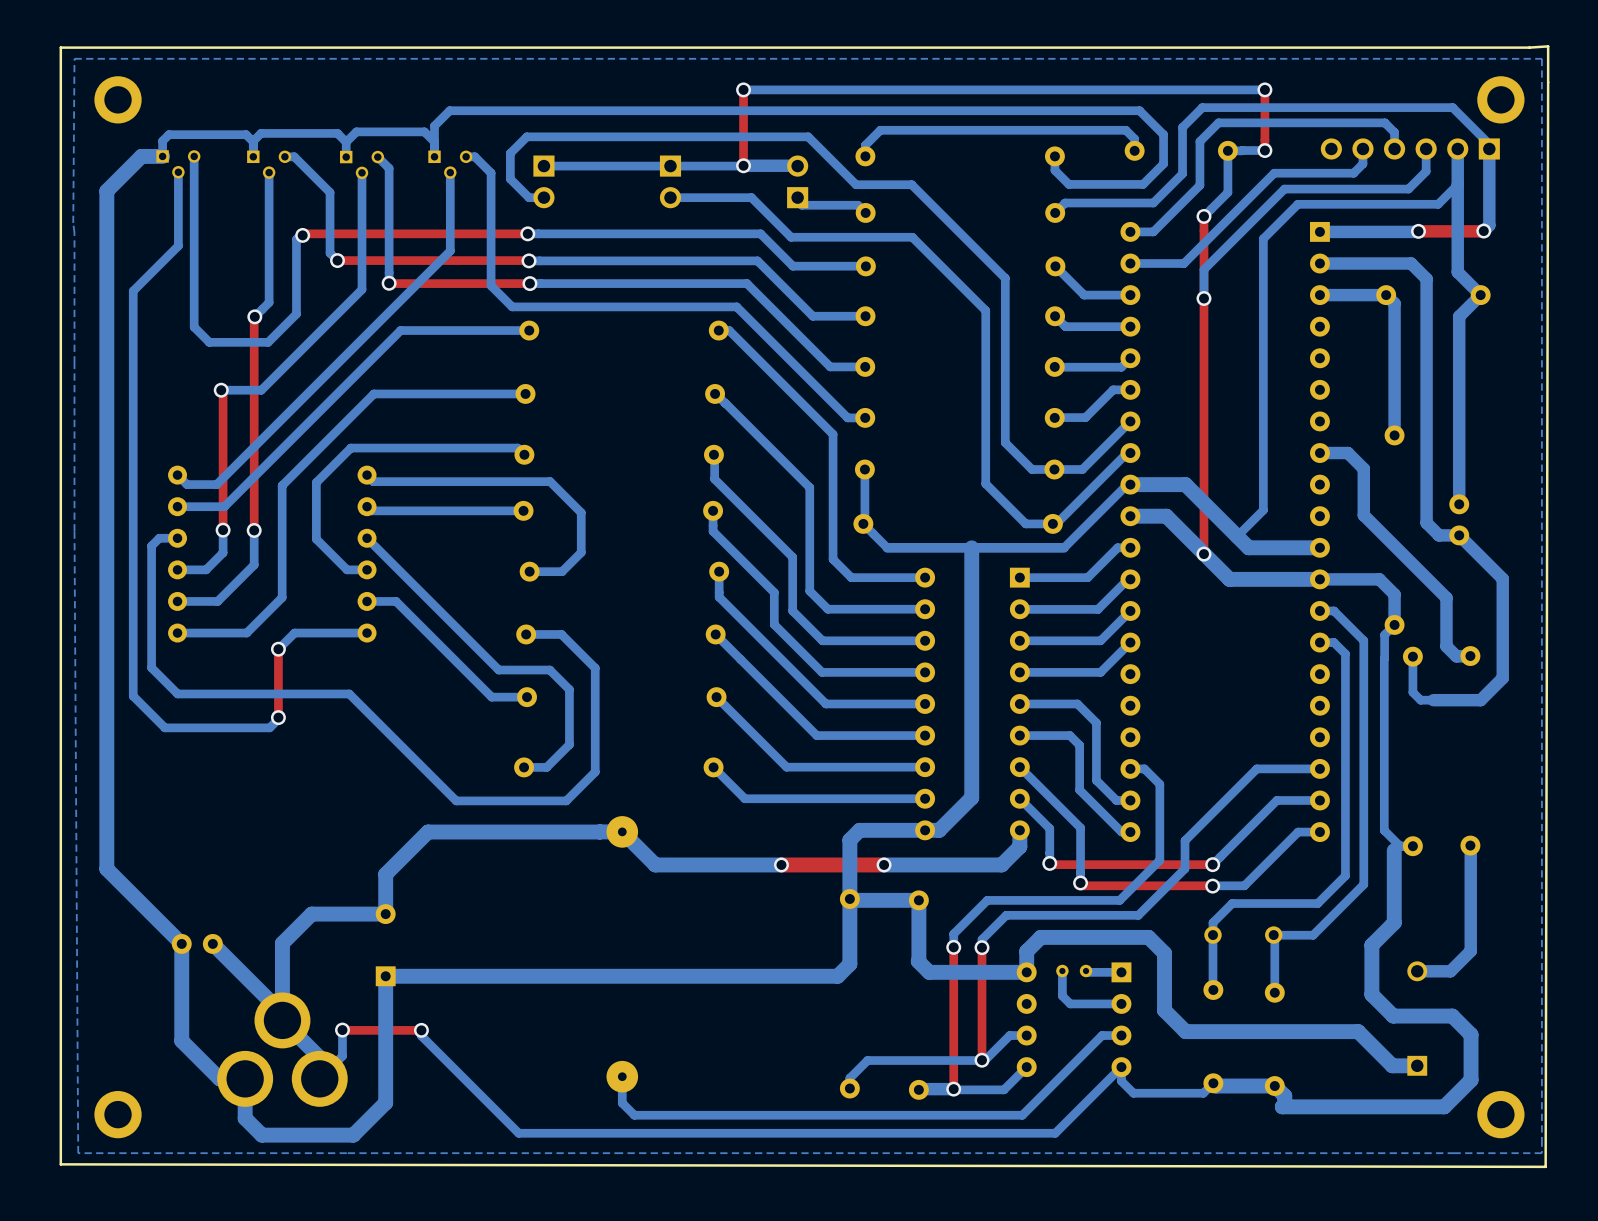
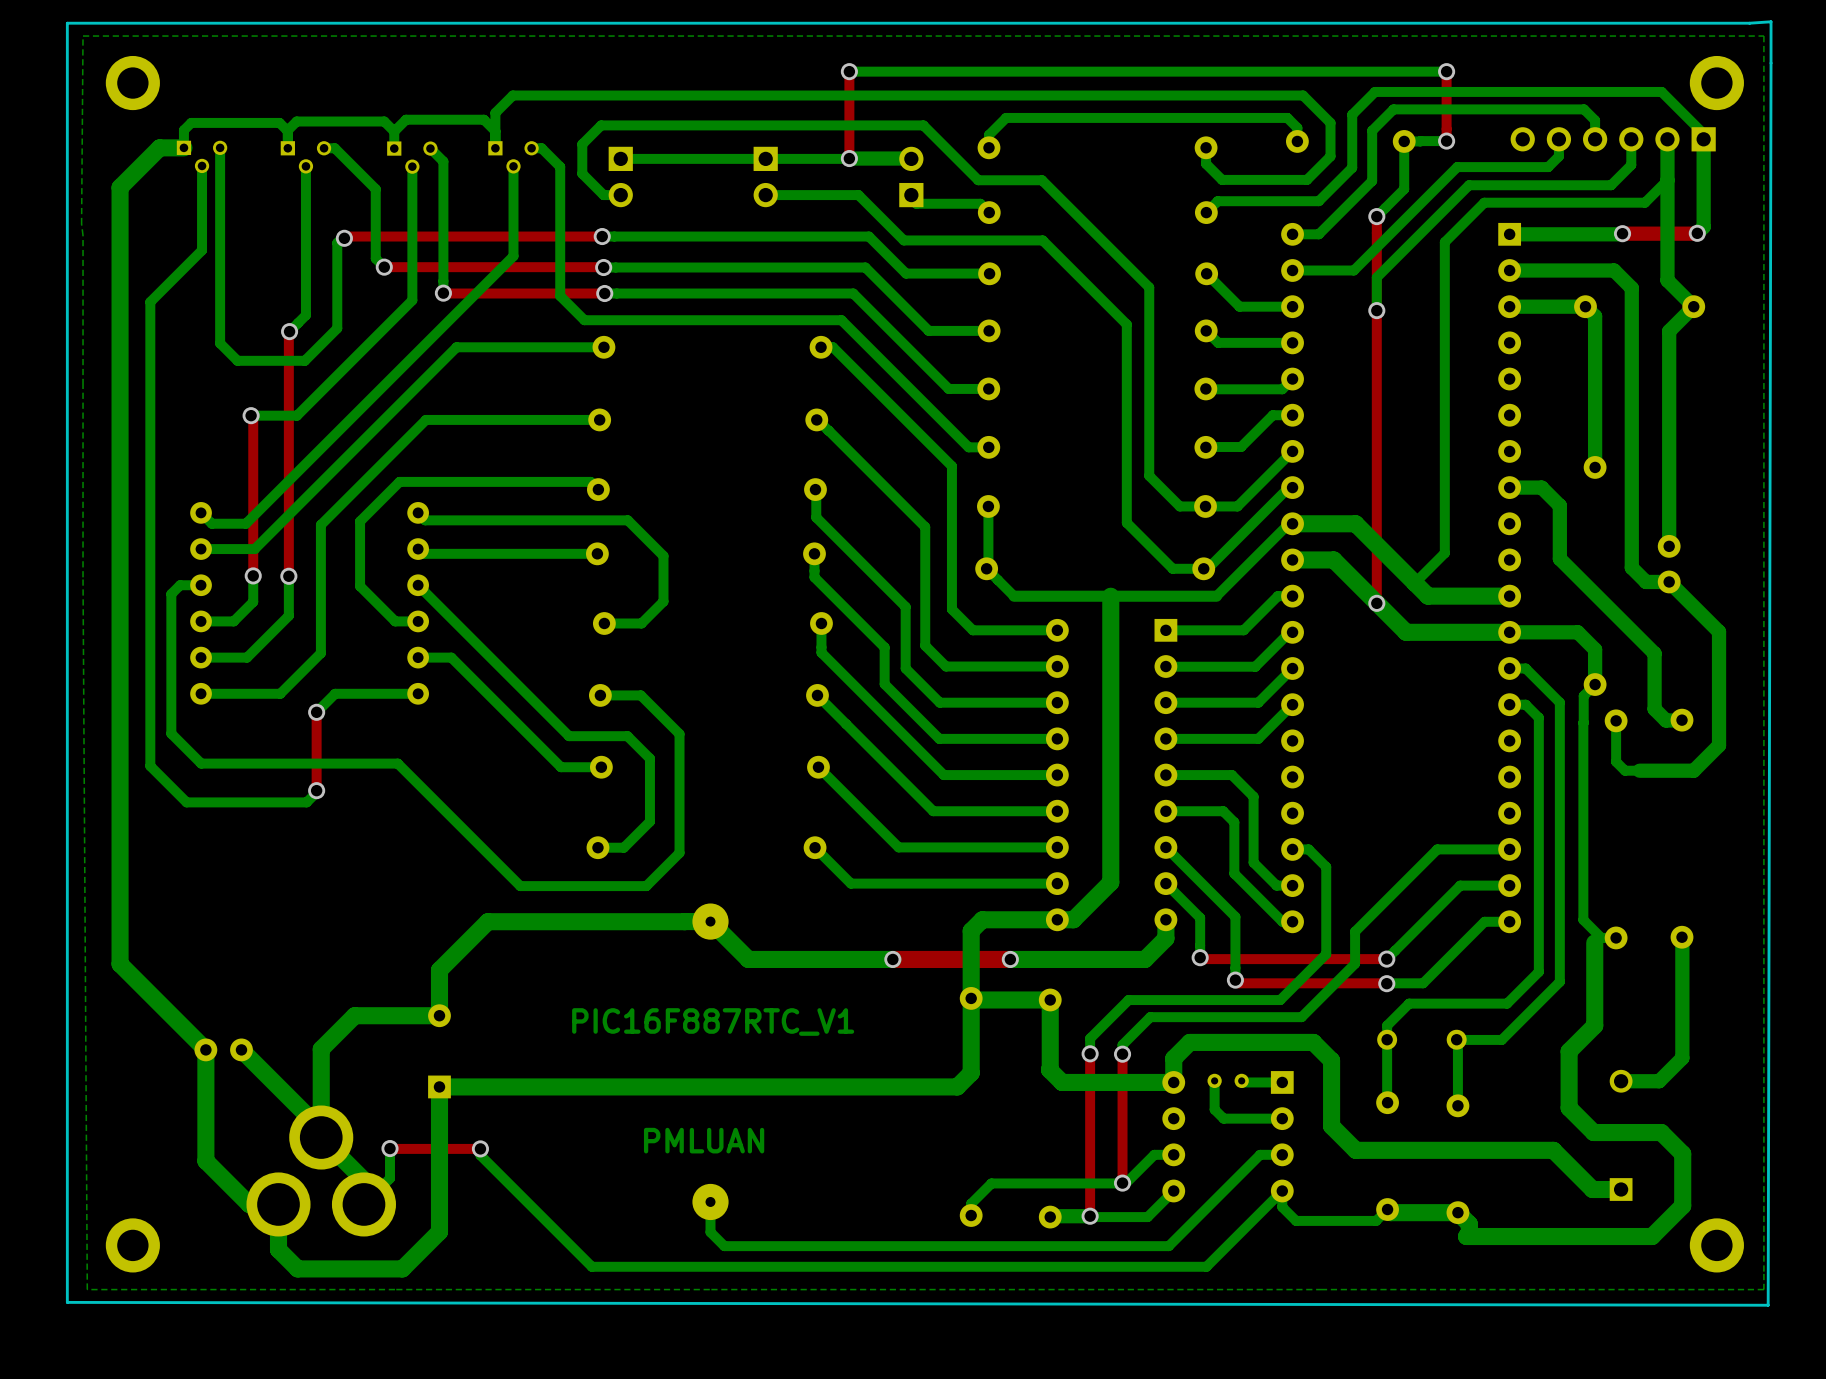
text: none -> PIC16F887RTC_V1 (713, 1021)
text: none -> PMLUAN (704, 1140)

